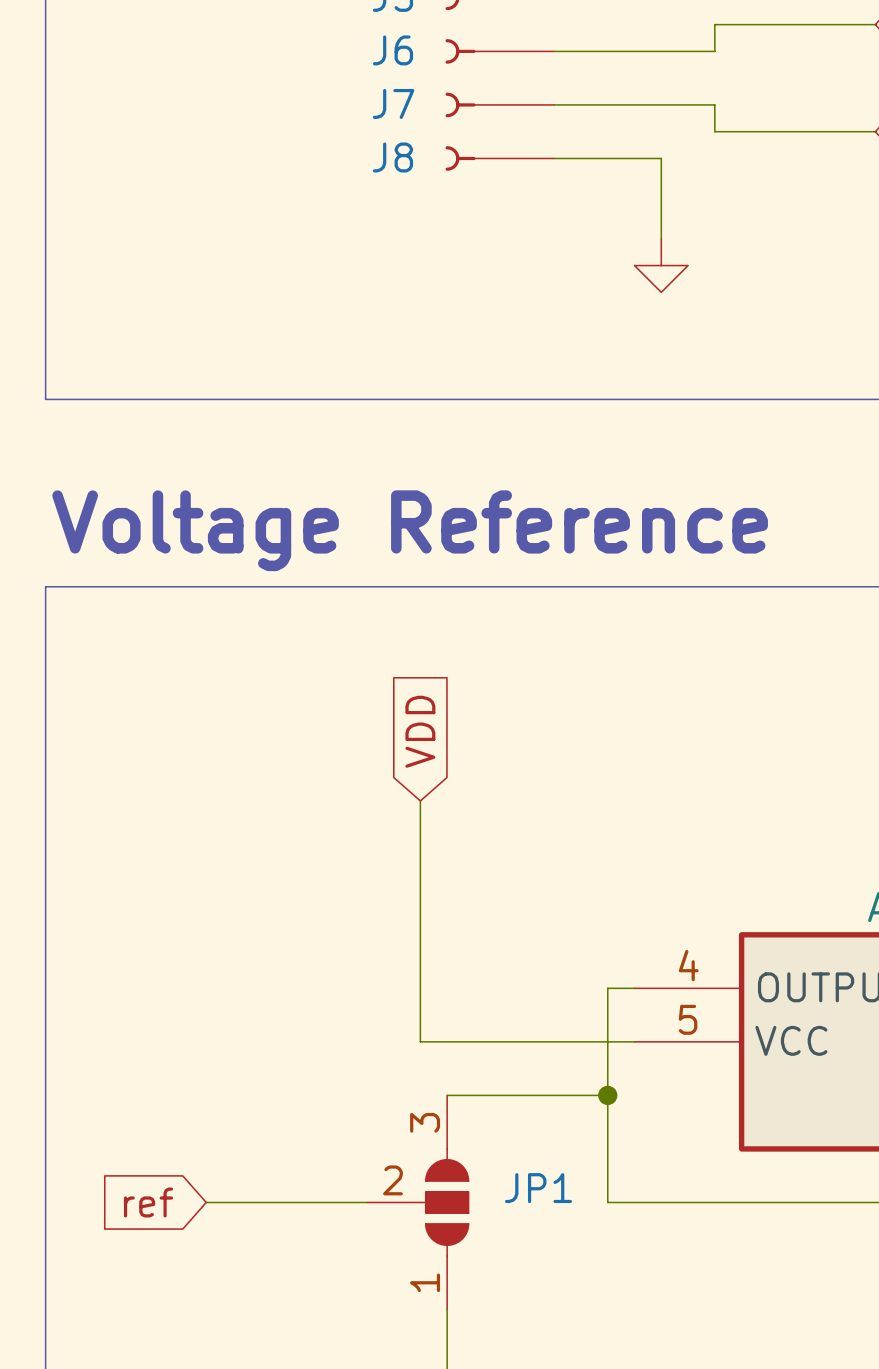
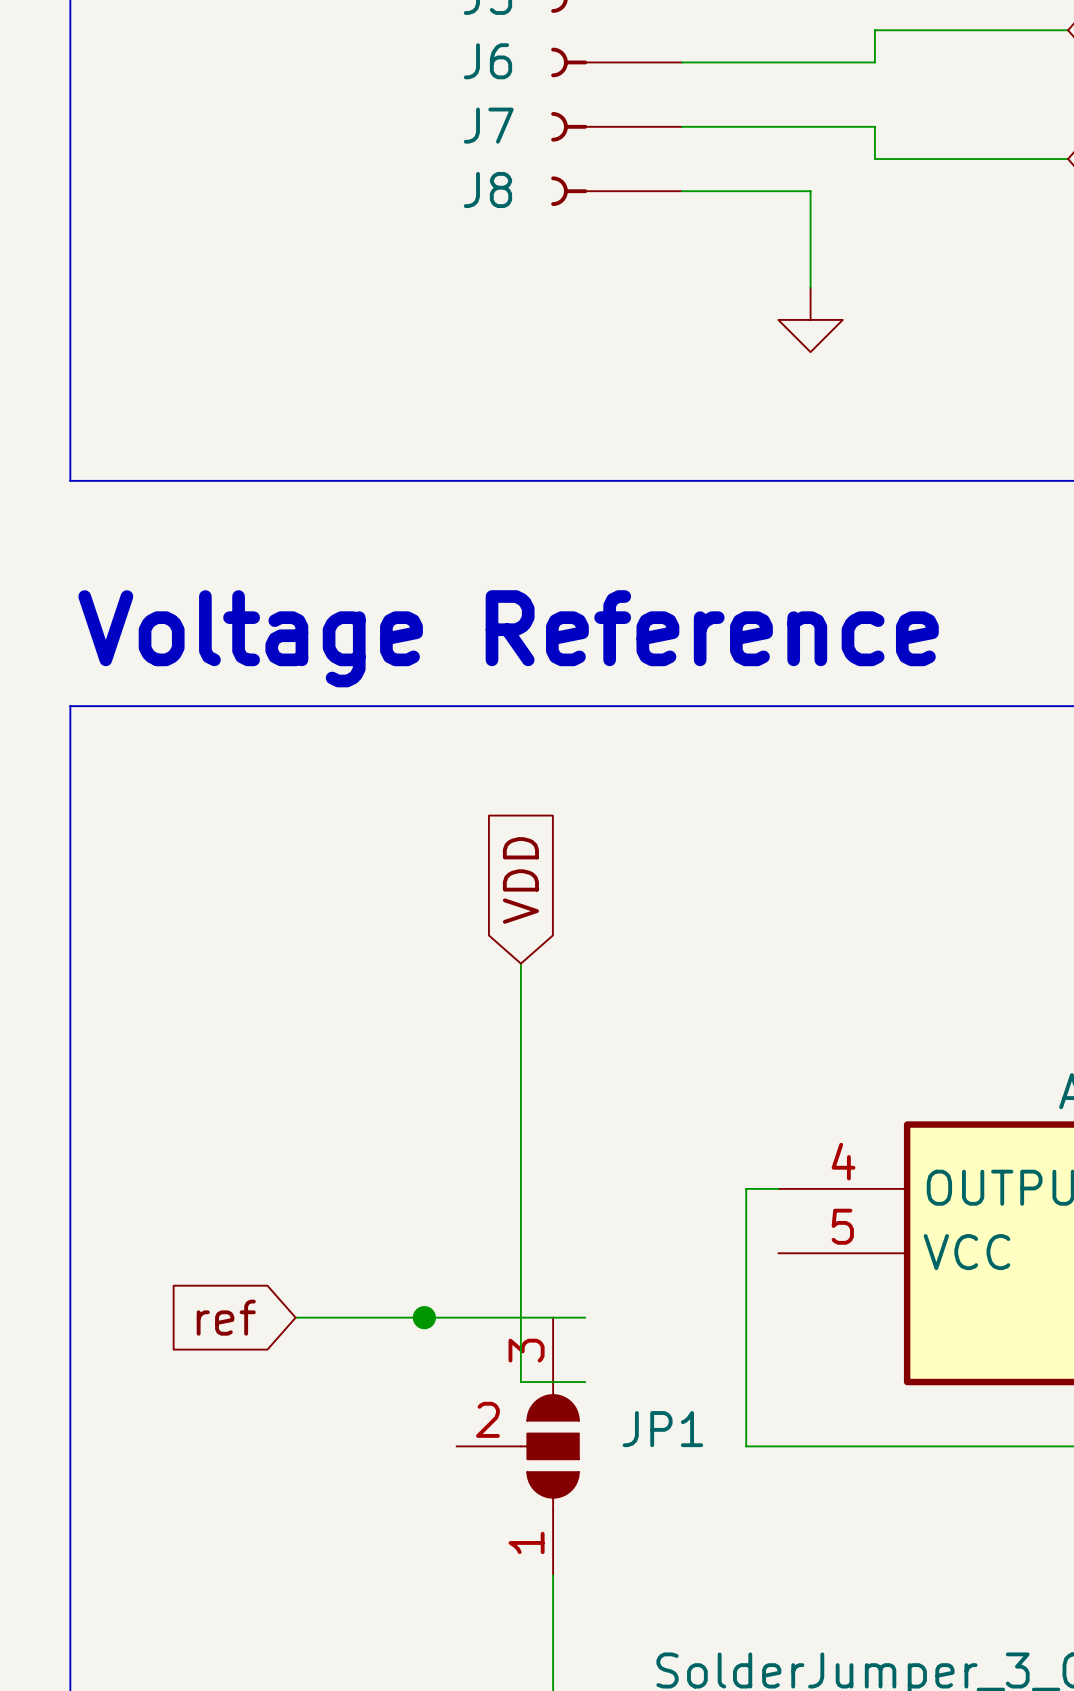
wire: (420, 1041) (634, 1041) -> (520, 1253) (520, 1382) (585, 1382)
wire: none -> (295, 1317) (553, 1317)
junction: none -> (424, 1317)
wire: (473, 1095) (607, 1095) -> none
junction: (607, 1095) -> none
global label position: ref (148, 1202) -> ref (226, 1317)
wire: (206, 1202) (366, 1202) -> none

